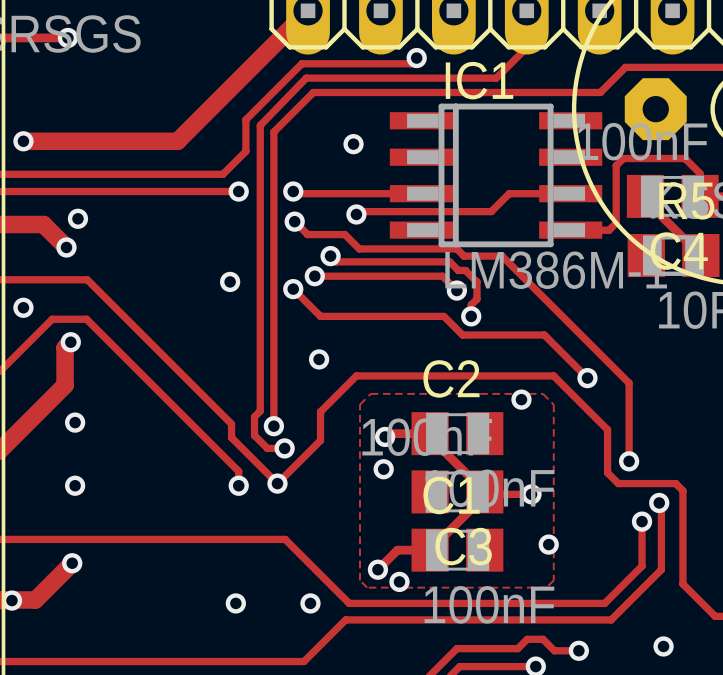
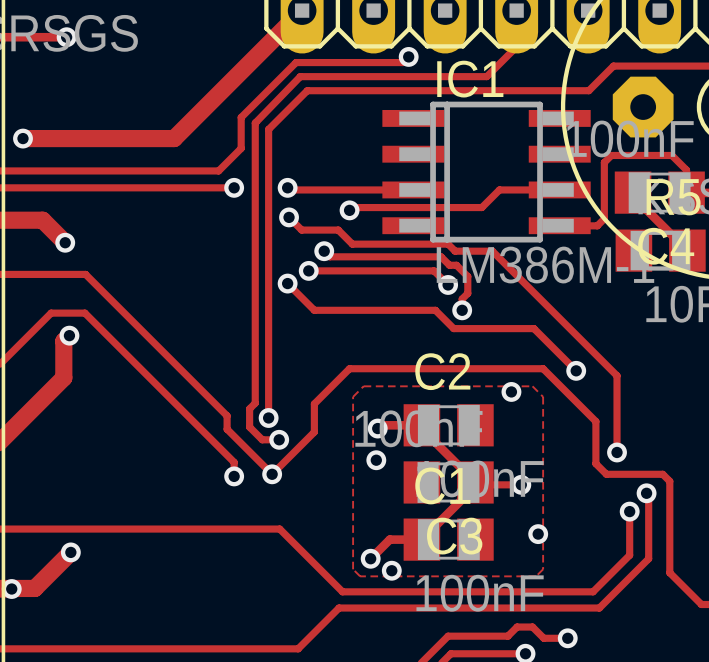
via: (353, 144) -> none
via: (77, 218) -> none
via: (230, 281) -> none
via: (23, 307) -> none
via: (319, 359) -> none
via: (75, 422) -> none
via: (75, 485) -> none
via: (235, 603) -> none
via: (310, 603) -> none
via: (663, 646) -> none

